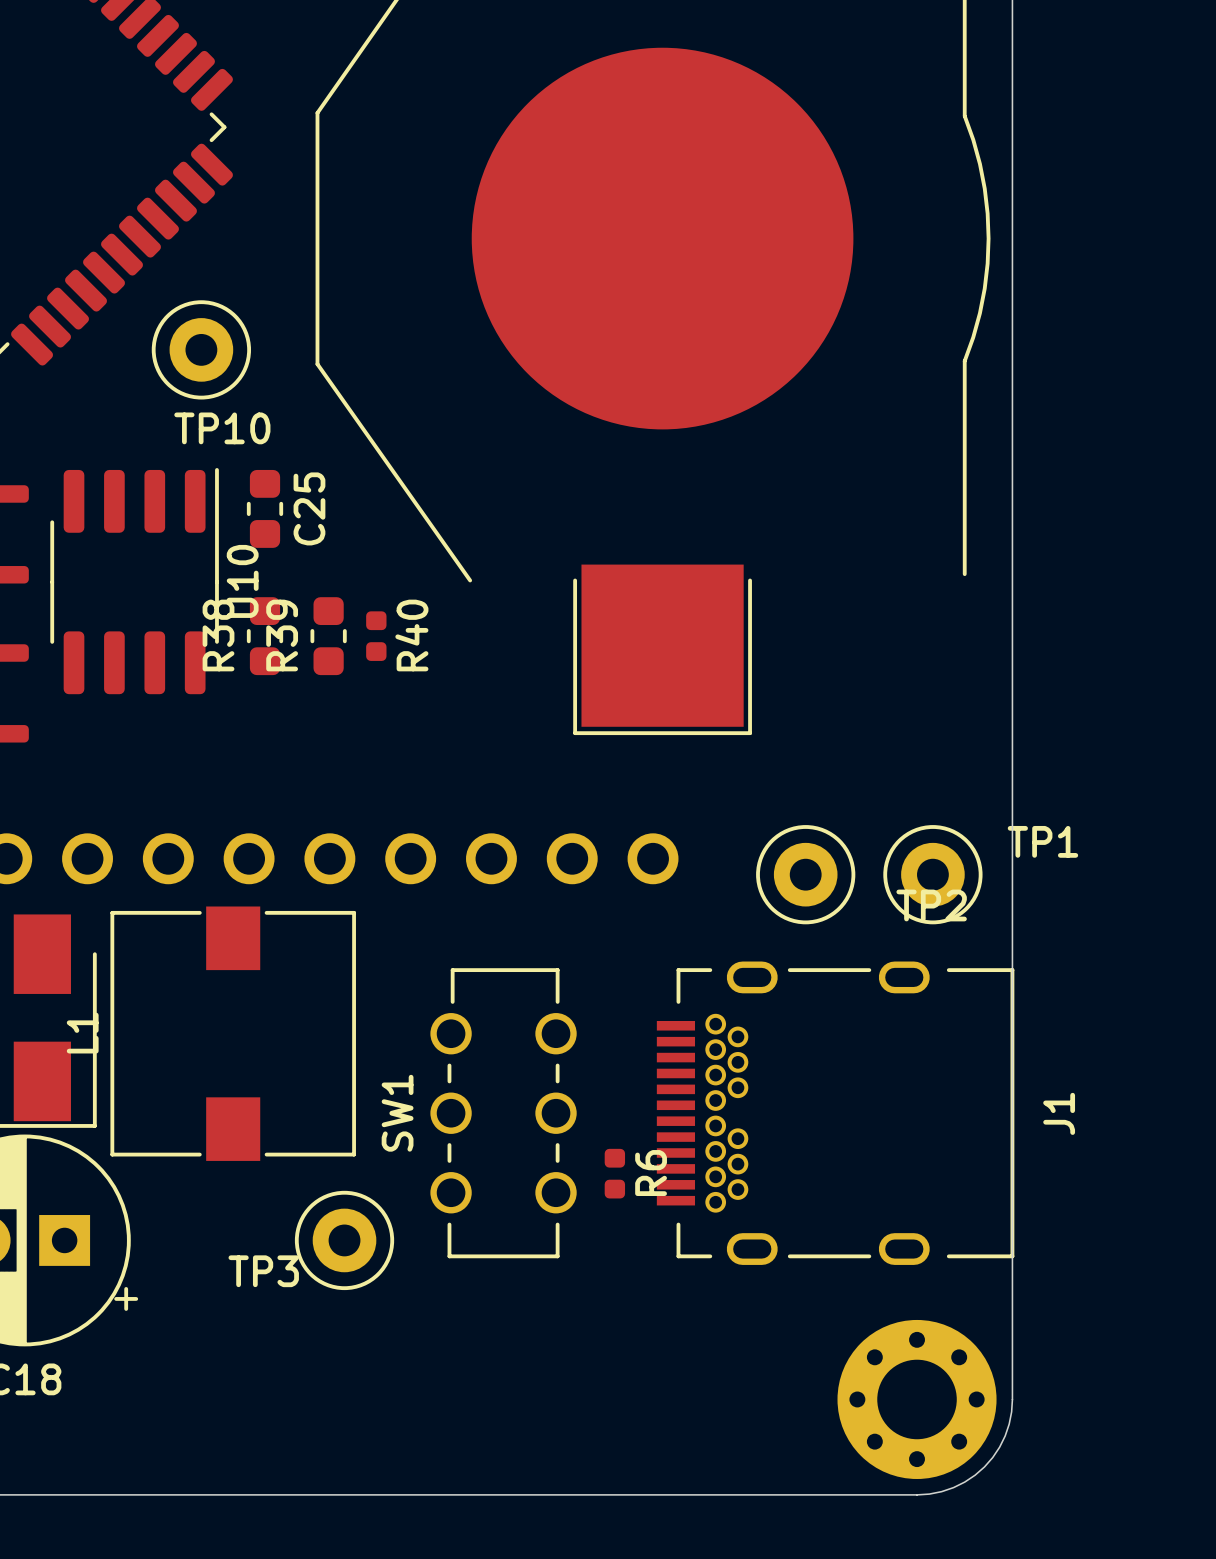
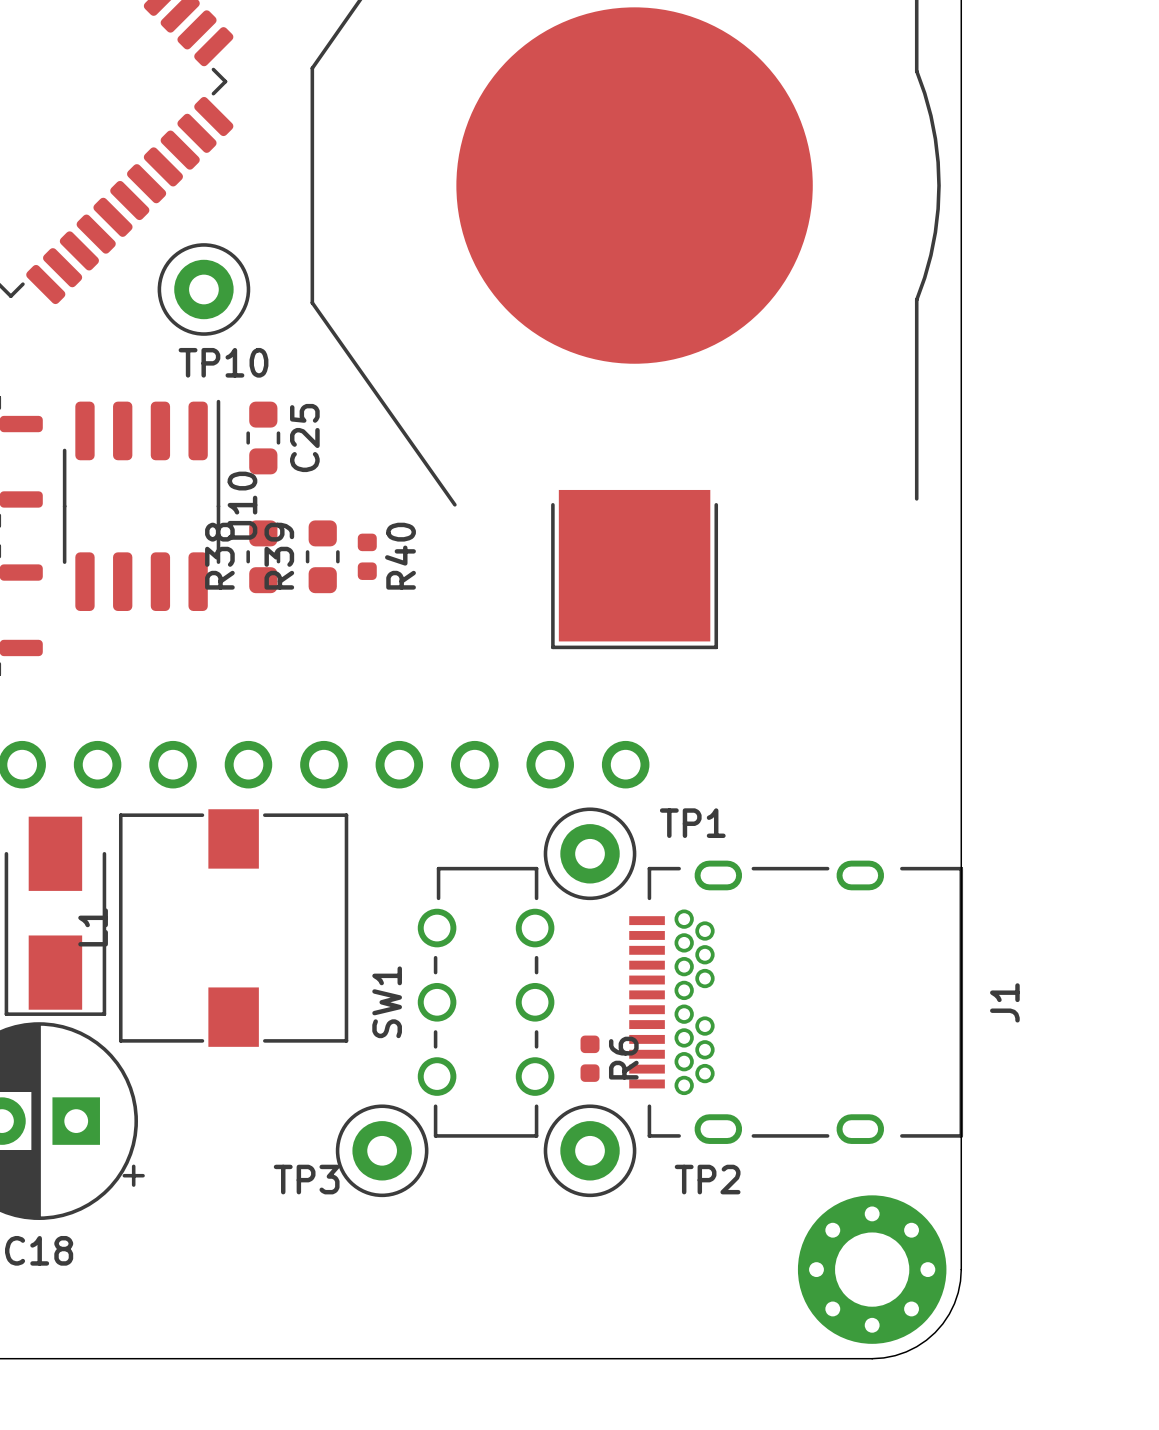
TP2 position: (805, 874) -> (590, 1150)
TP1 position: (932, 874) -> (590, 853)
TP3 position: (344, 1240) -> (382, 1150)

